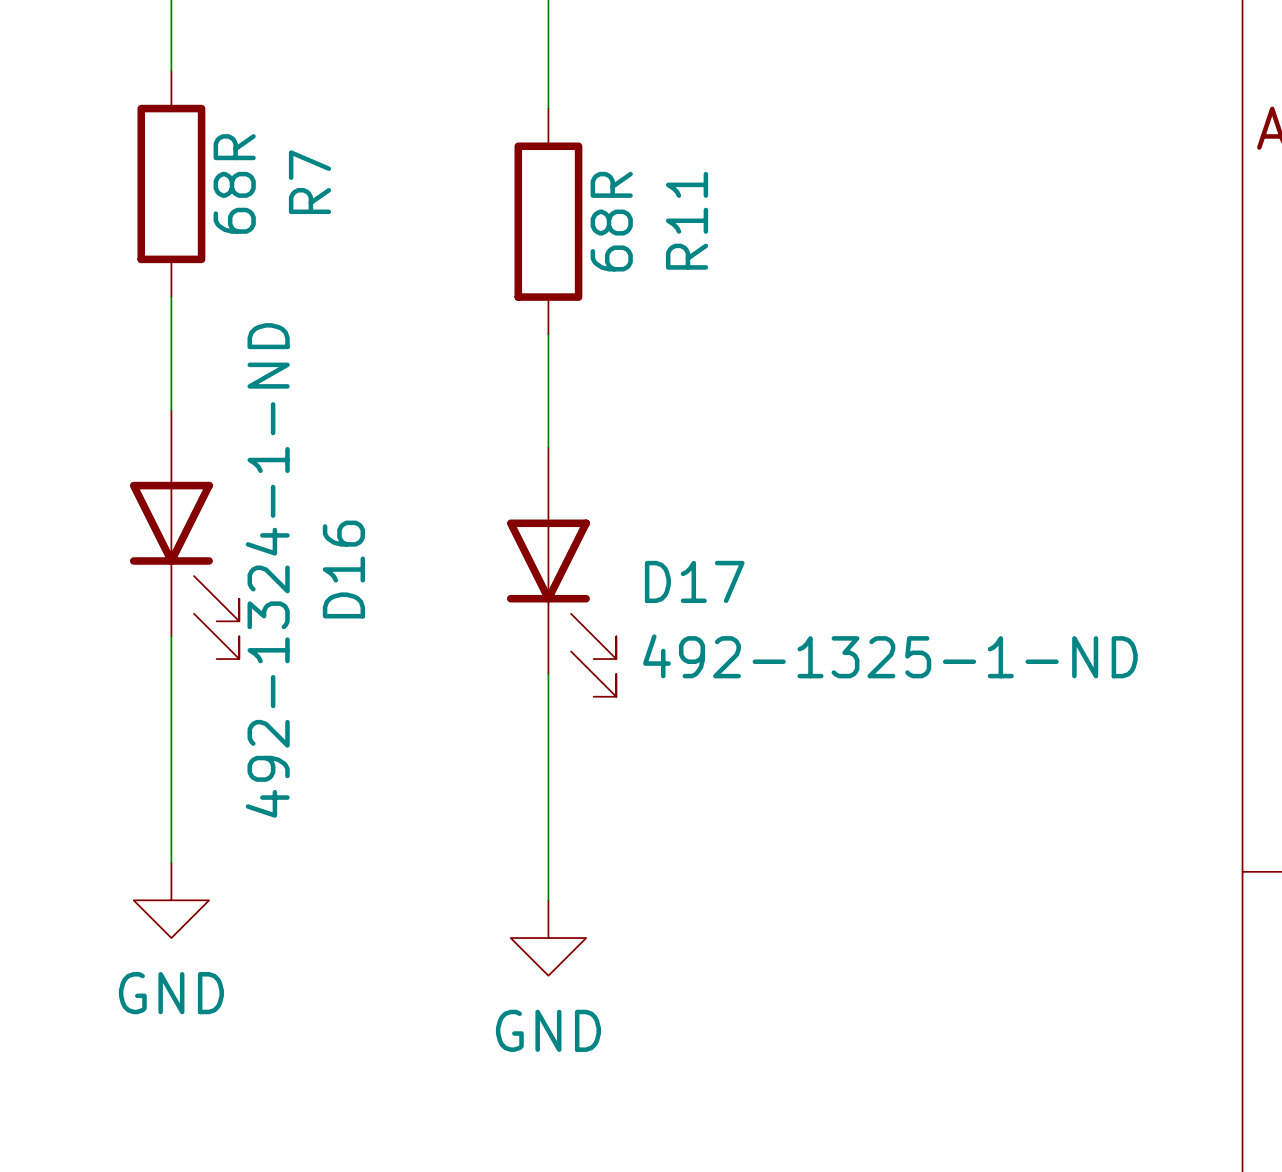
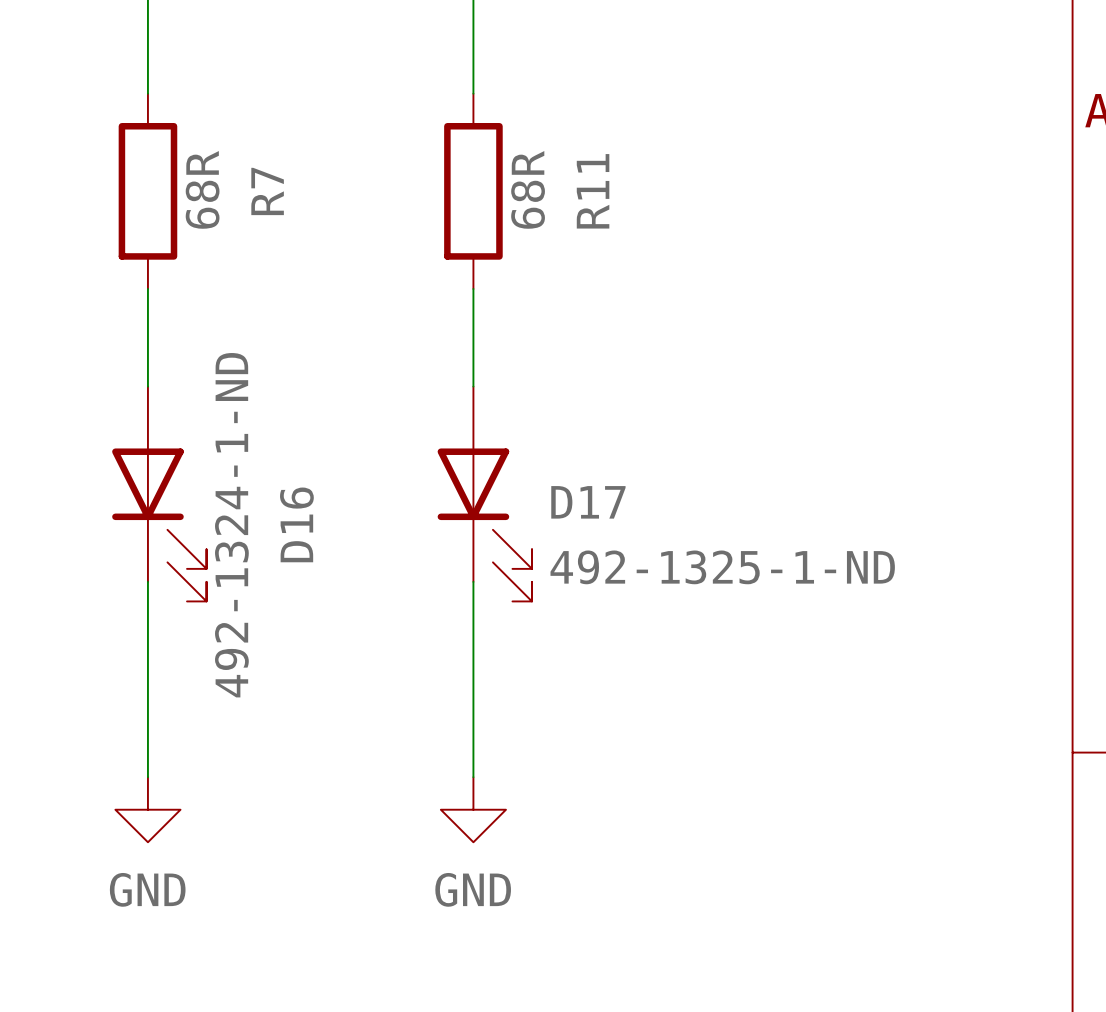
R7 position: (171, 183) -> (147, 191)
D16 position: (184, 534) -> (159, 494)
power symbol position: GND (171, 900) -> GND (147, 809)

